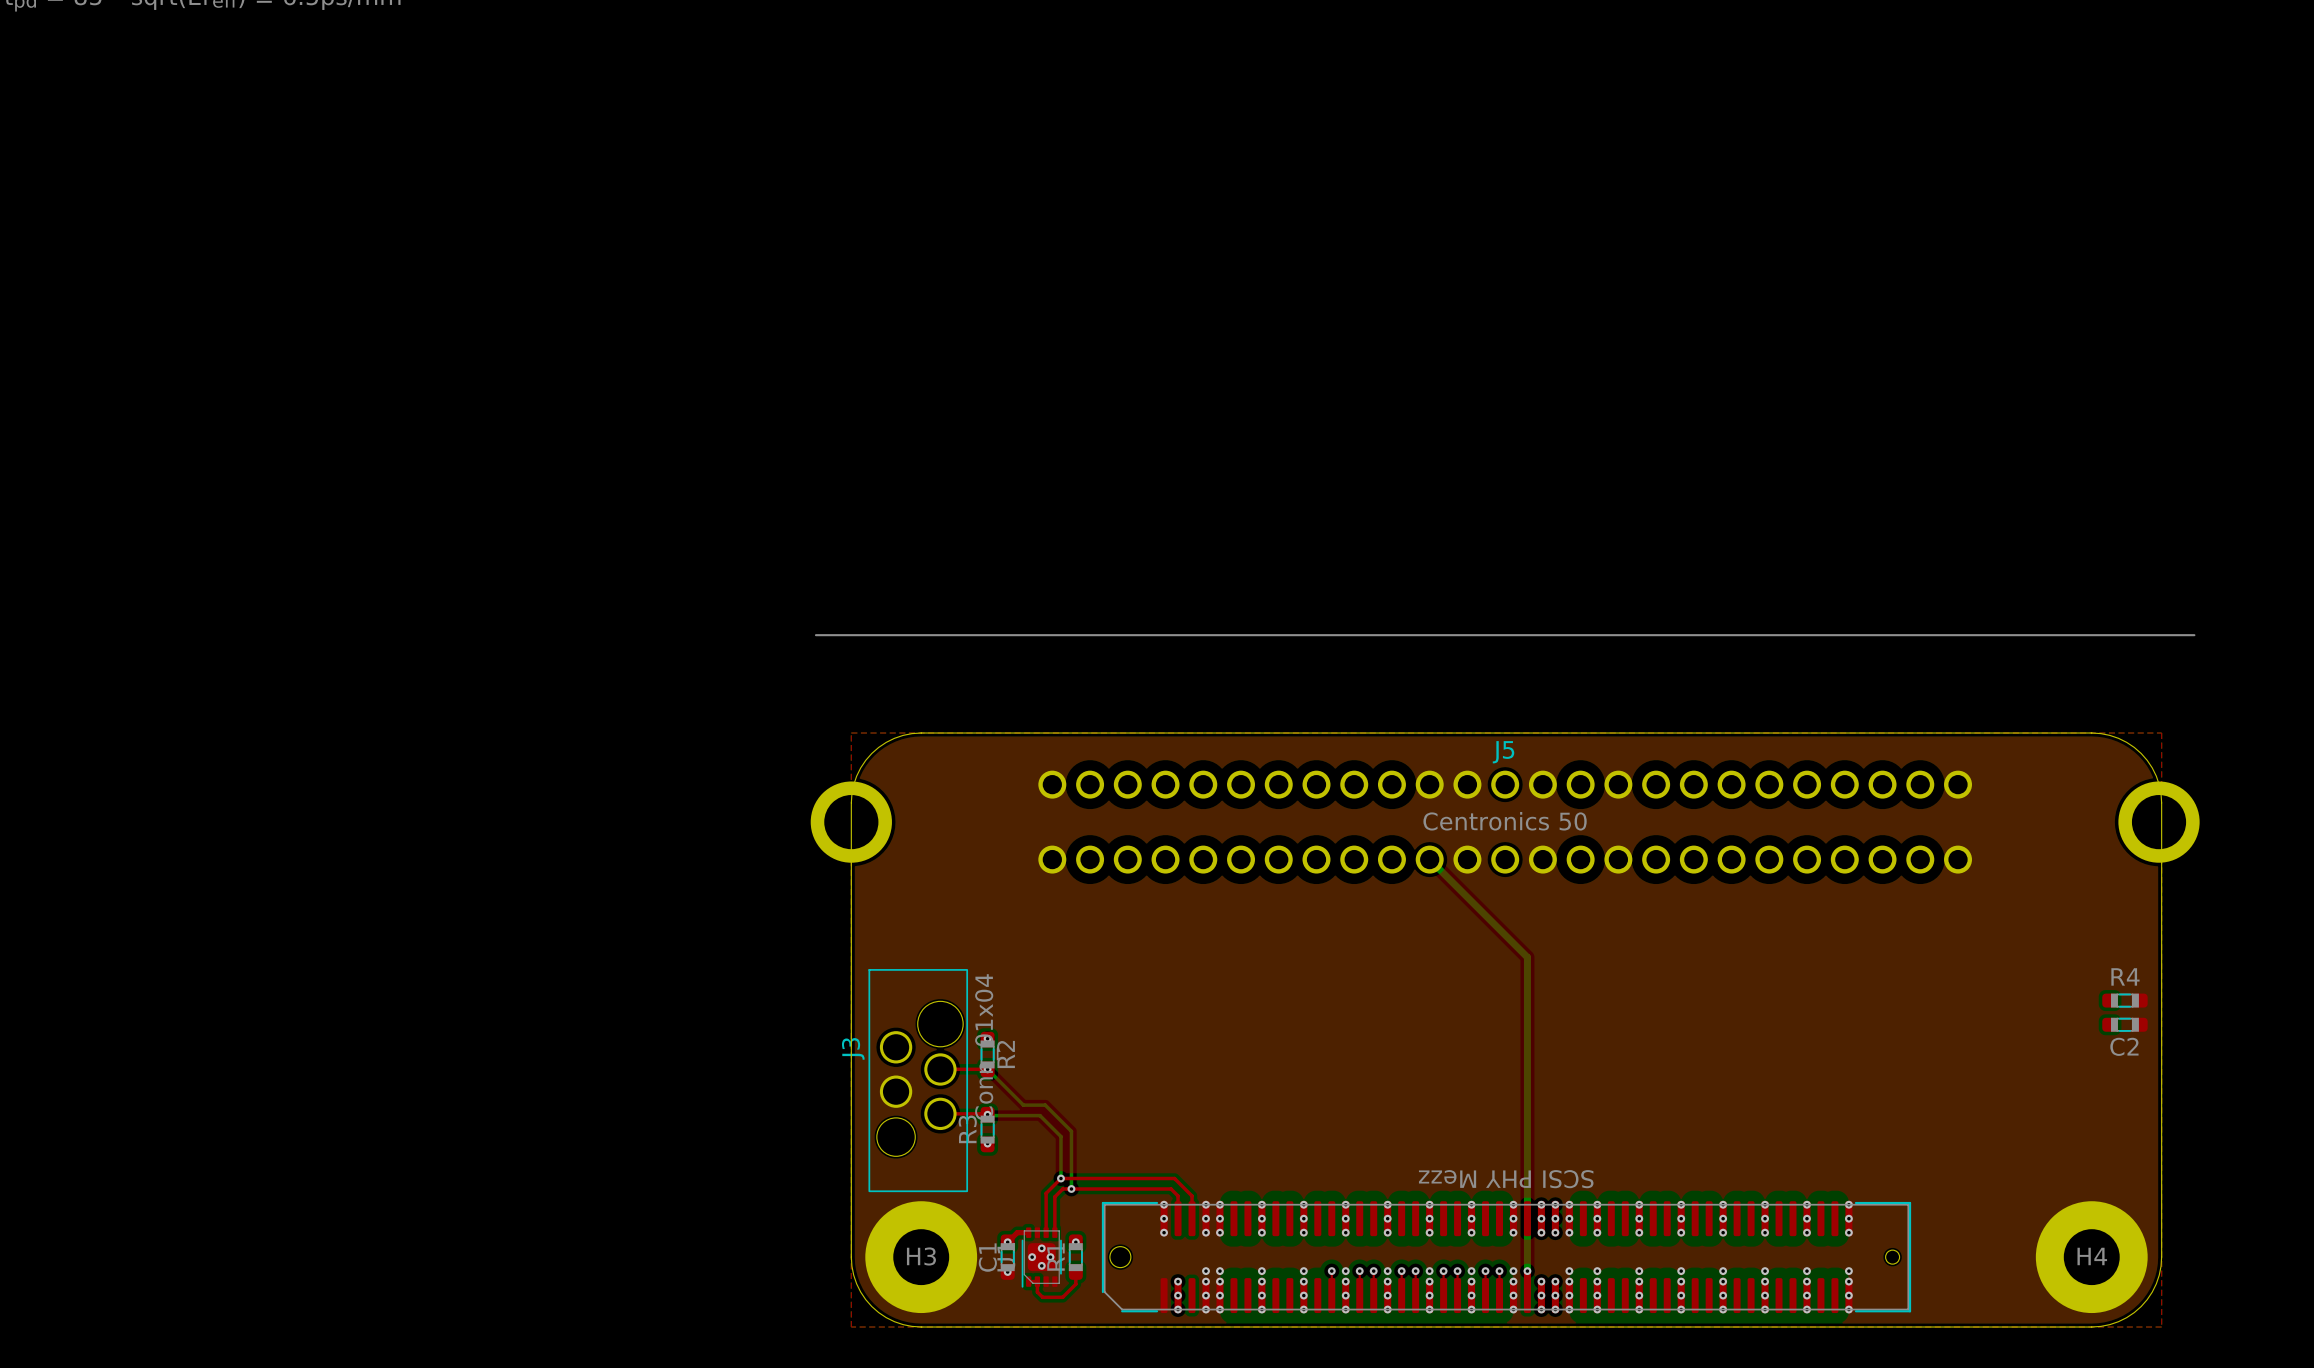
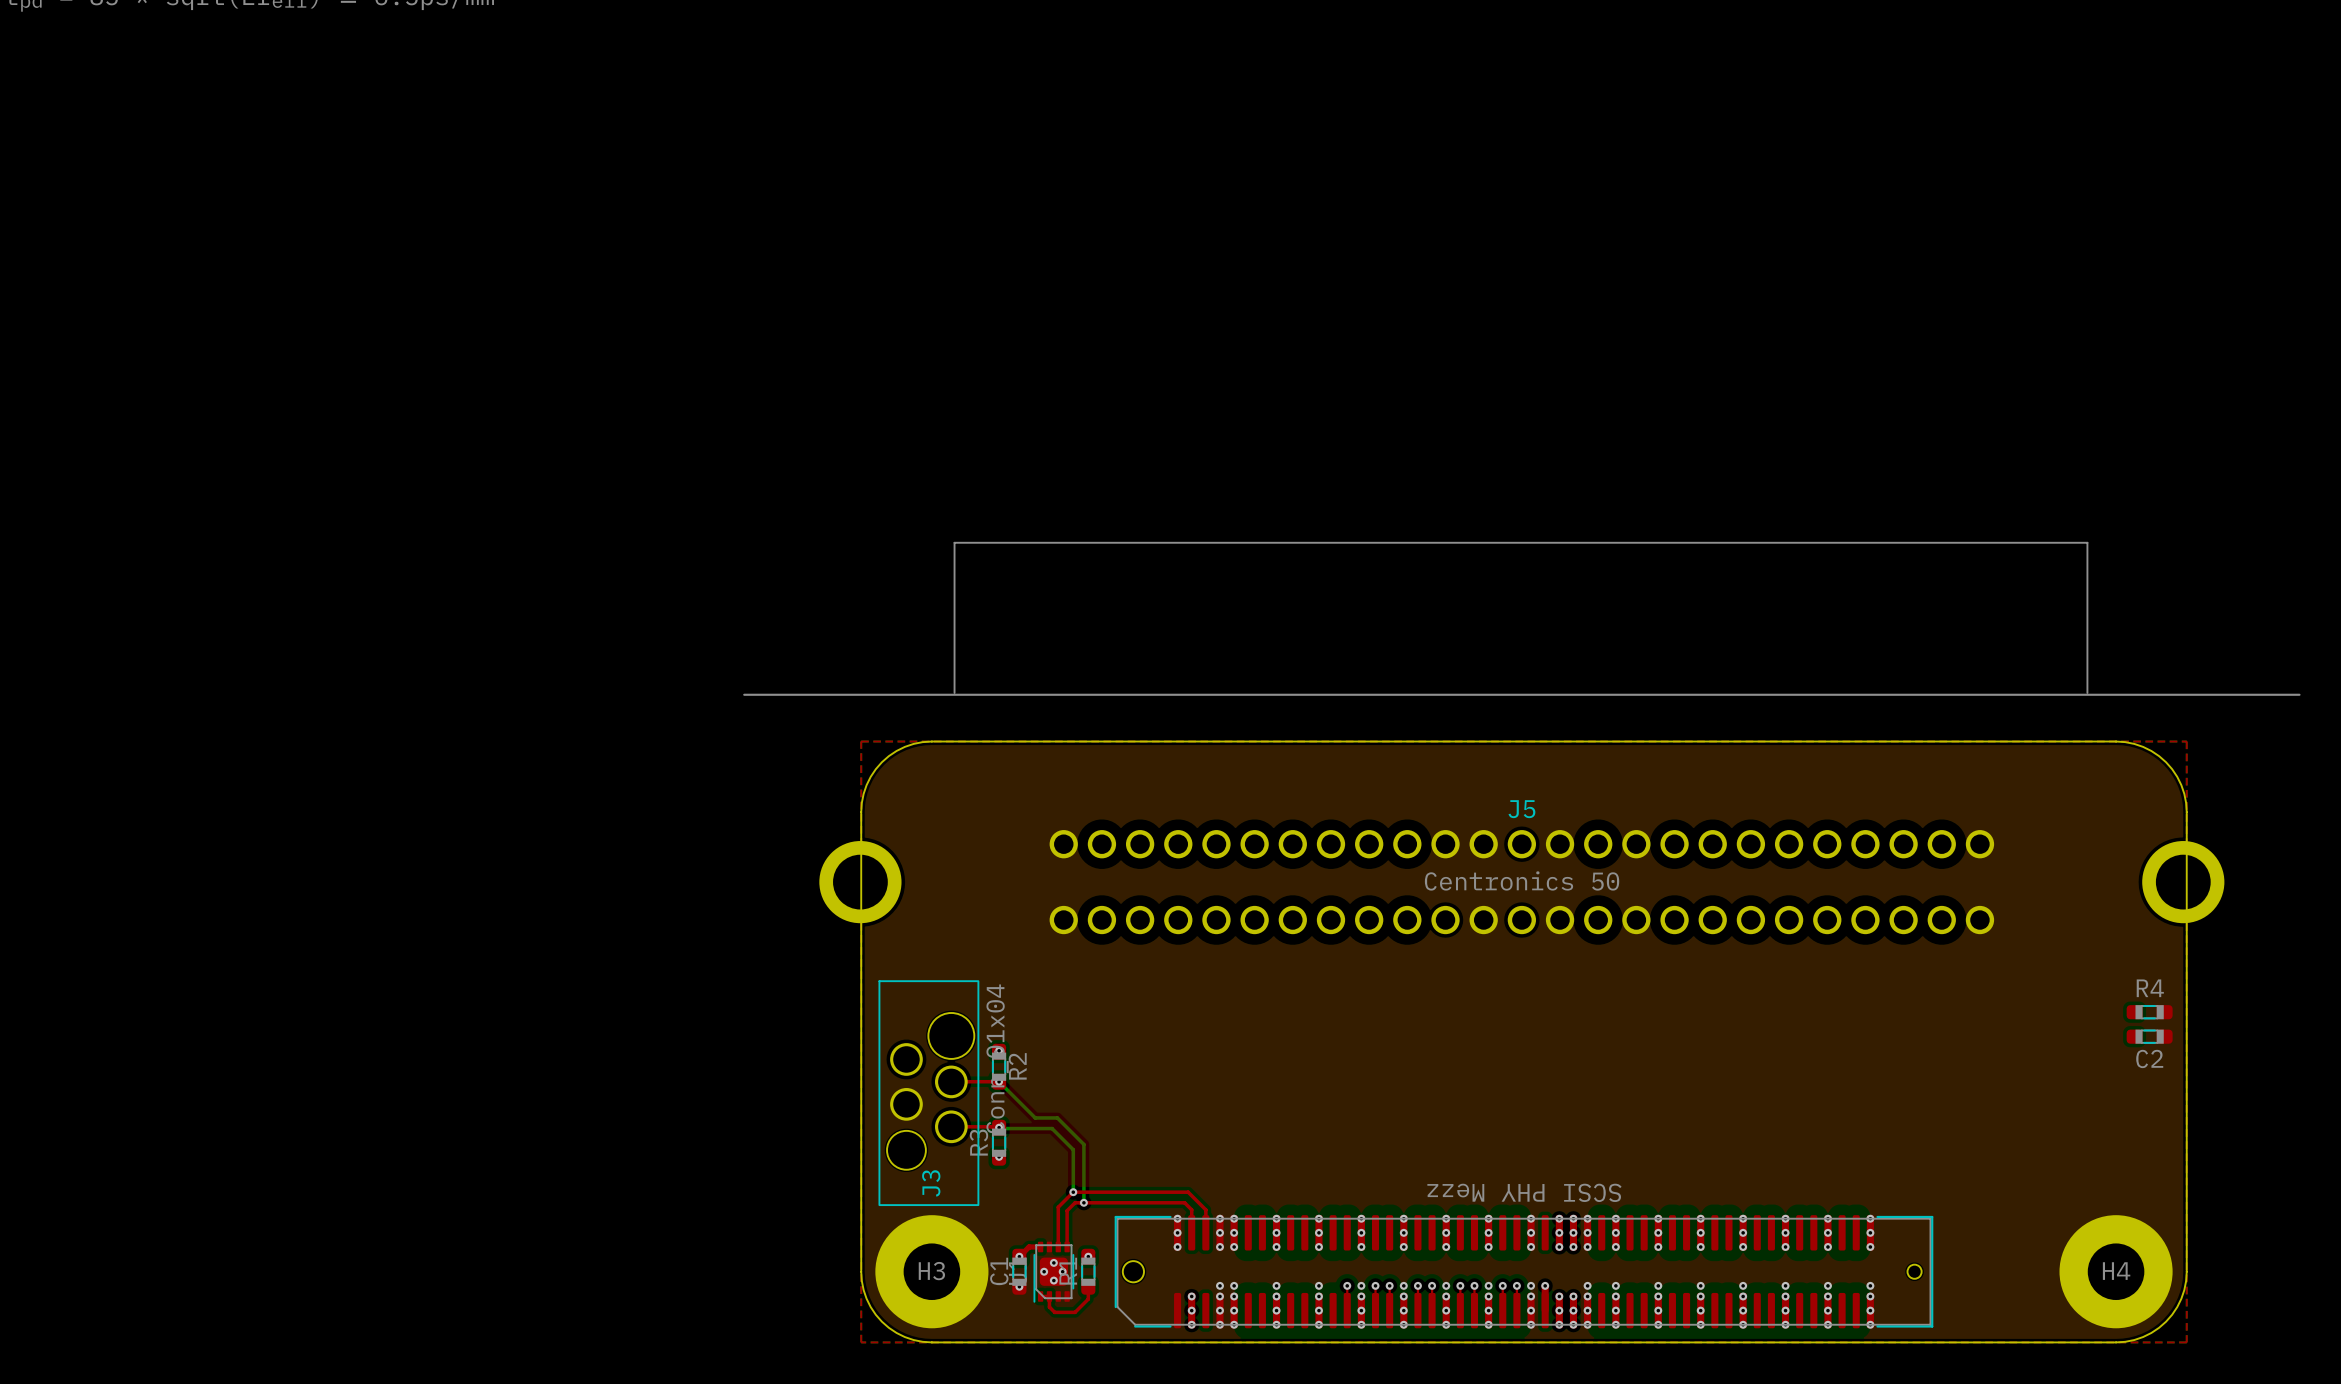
J5 footprint: [810, 634, 2200, 874] -> [743, 541, 2301, 935]
J5 name position: J5 (1503, 752) -> J5 (1521, 809)
J5 value position: Centronics 50 (1505, 821) -> Centronics 50 (1522, 880)
bottom track: (1429, 859) (1527, 957) (1527, 1271) -> none
J3 name position: J3 (853, 1048) -> J3 (931, 1183)

